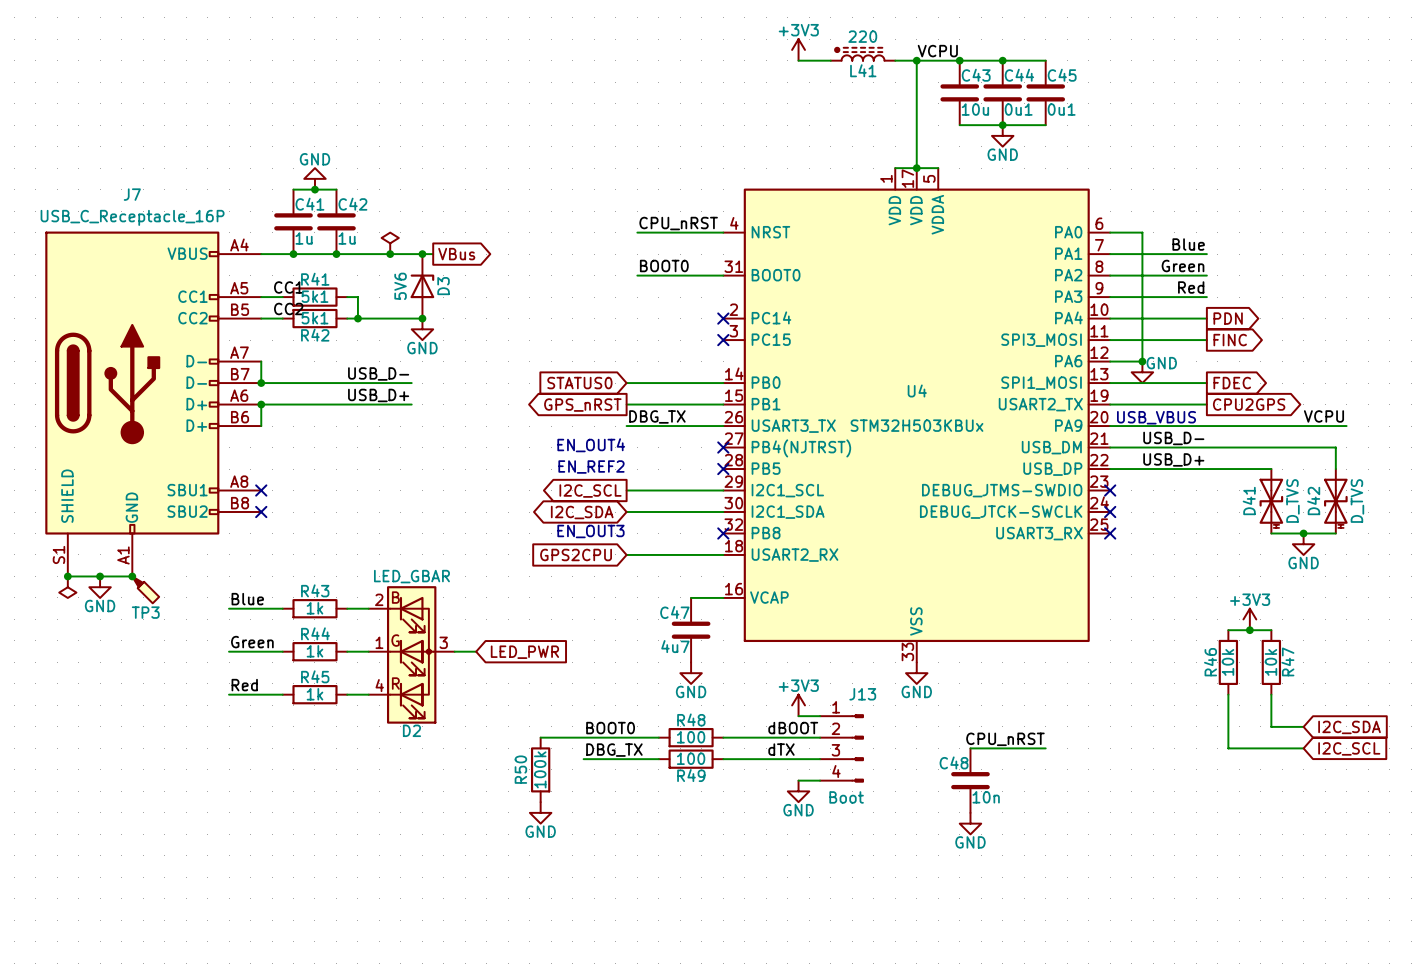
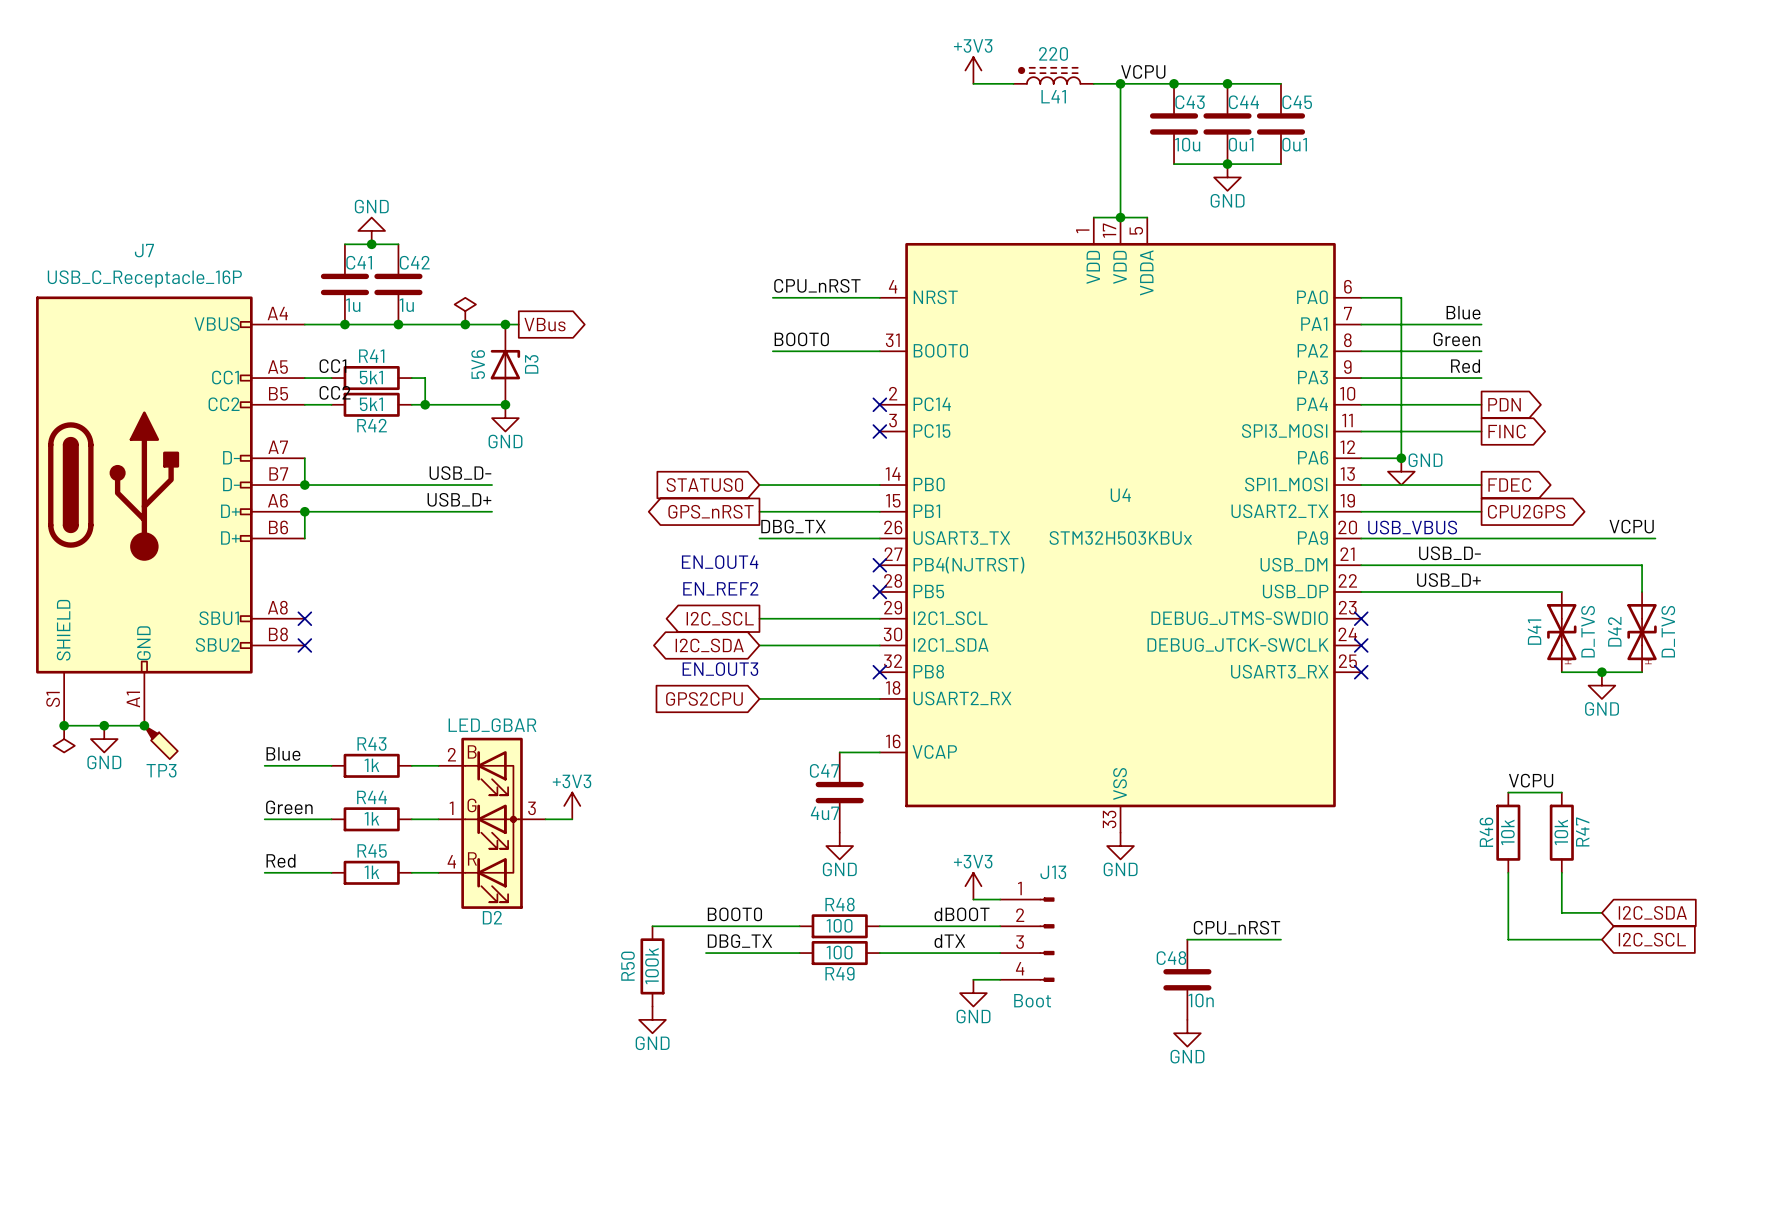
power symbol: +3V3 (1249, 619) -> none
label: none -> VCPU (1531, 780)
junction: (1249, 630) -> none
power symbol: none -> +3V3 (572, 805)
global label: LED_PWR (524, 652) -> none

